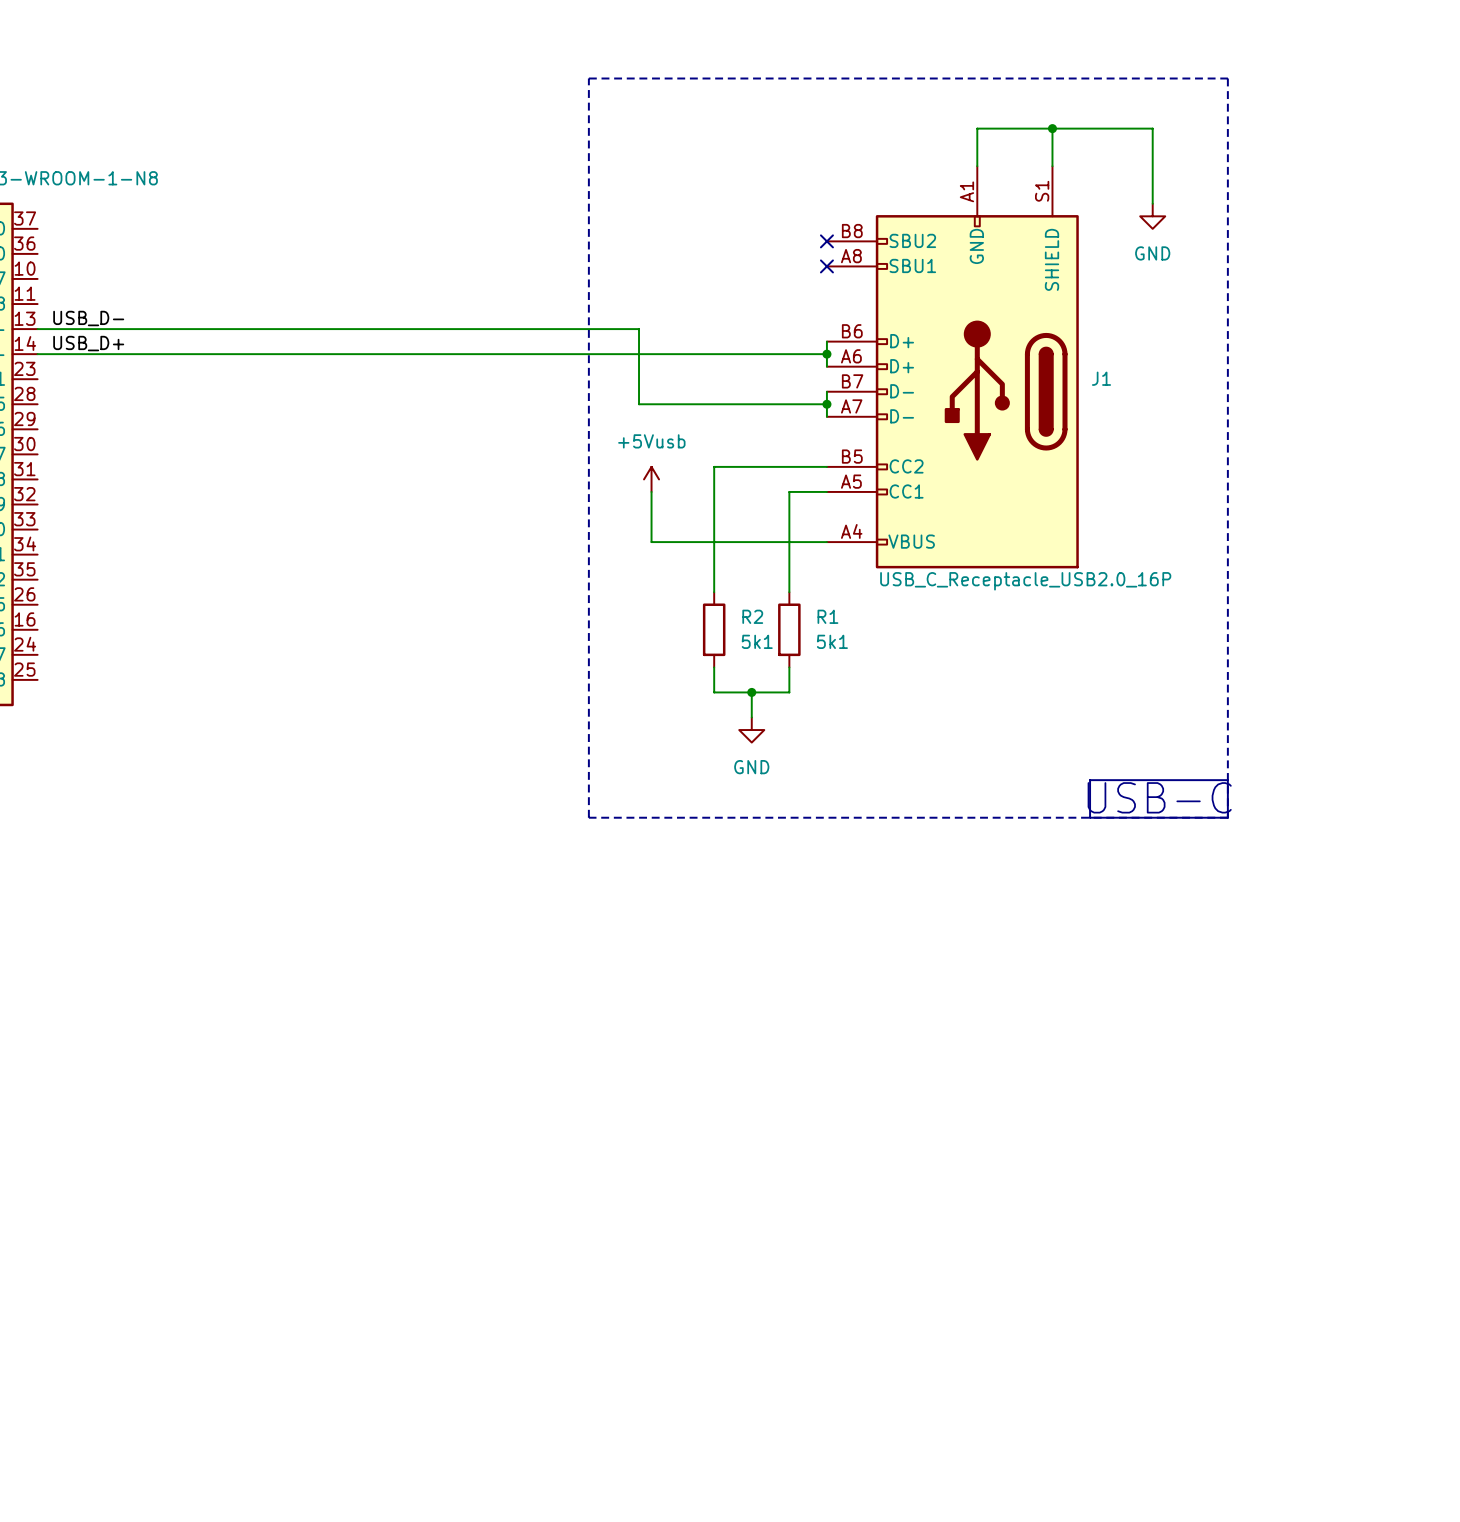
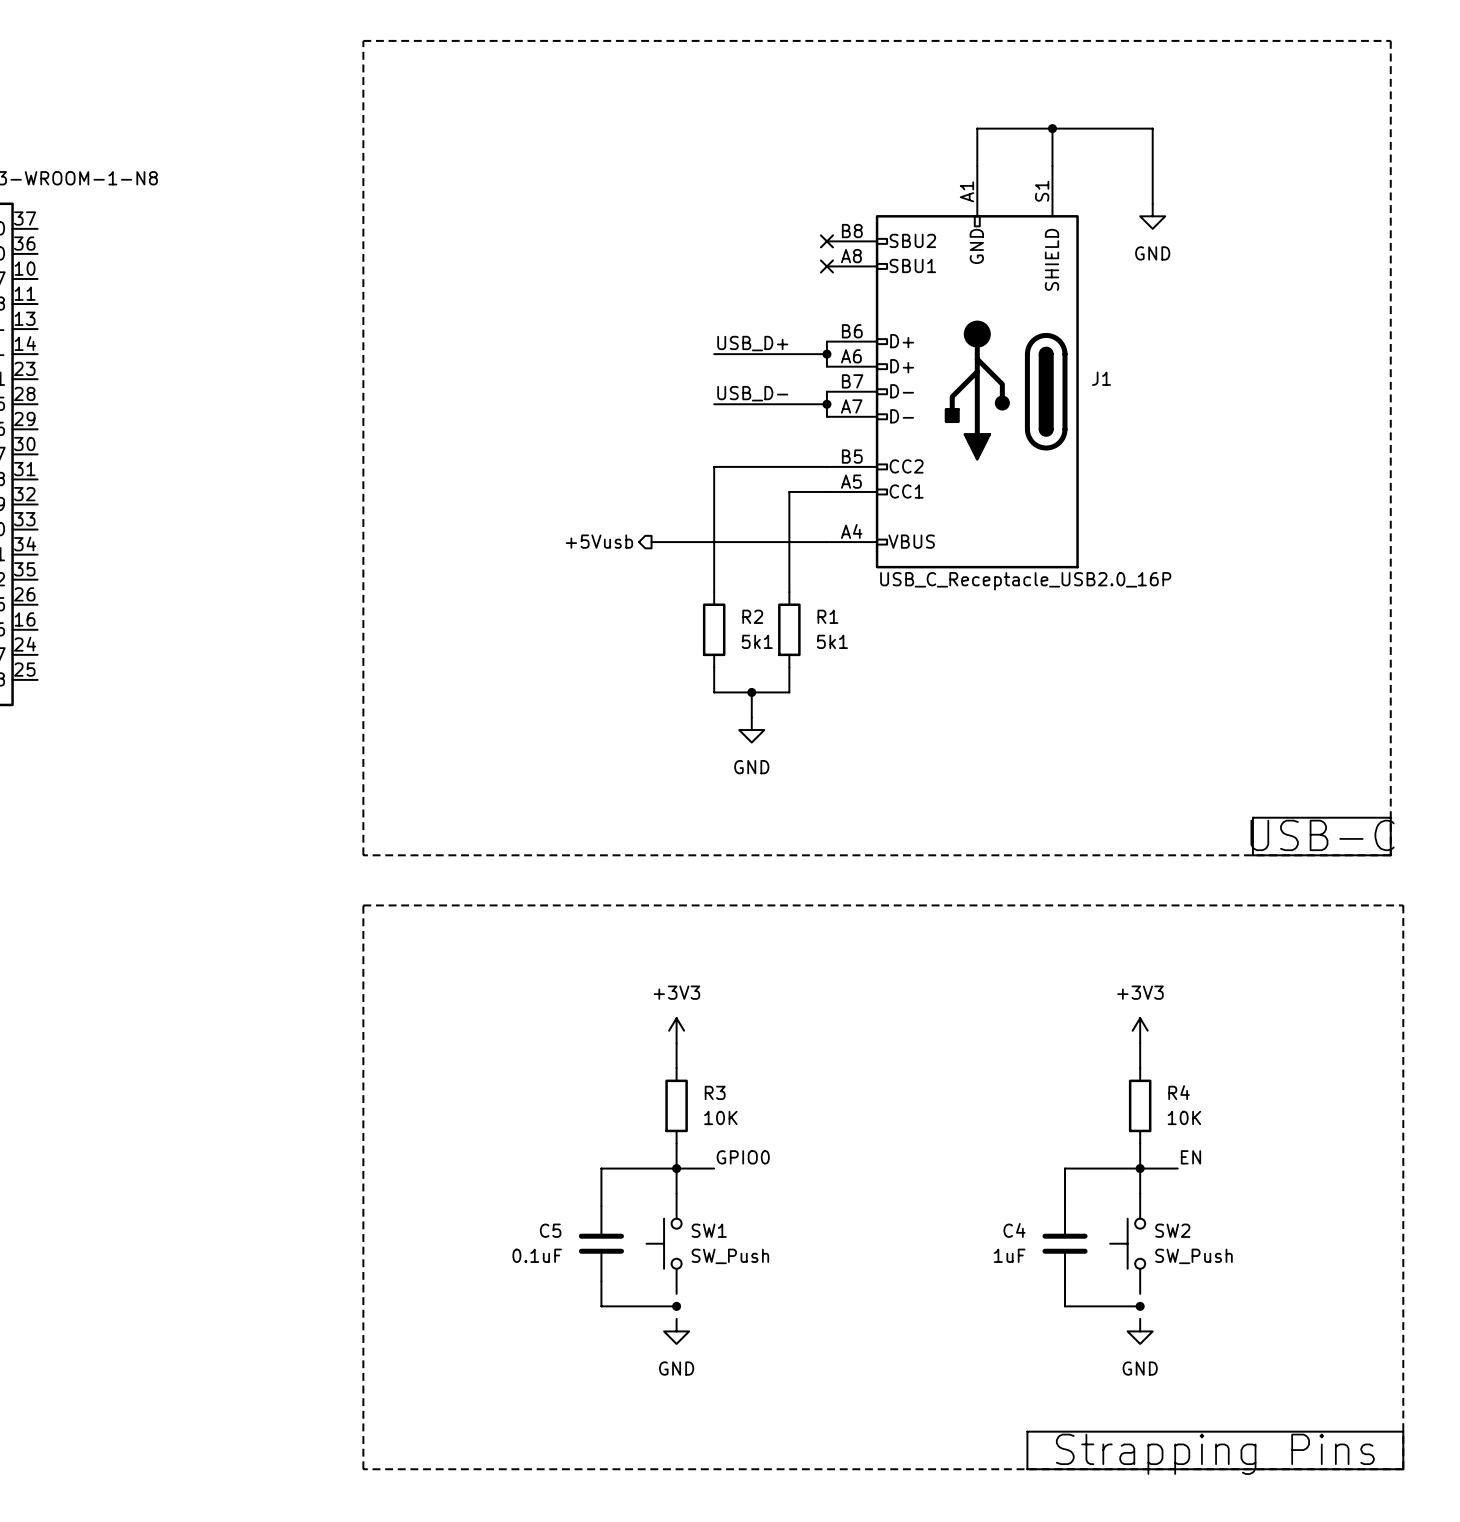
label: USB_D- (88, 318) -> none
wire: (37, 329) (639, 329) (639, 404) (714, 404) -> none
label: USB_D+ (88, 343) -> none
label: none -> USB_D+ (752, 343)
wire: (37, 354) (714, 354) -> none
label: none -> USB_D- (752, 393)
power symbol: +5Vusb (651, 479) -> none
wire: (651, 491) (651, 542) -> none
hierarchical label: none -> +5Vusb (599, 541)
text position: USB-C (1159, 797) -> USB-C (1322, 835)
line: (1227, 817) (1227, 780) (1090, 780) (1090, 817) (1227, 817) -> (1390, 855) (1390, 817) (1252, 817) (1252, 855) (1390, 855)
line: (1227, 817) (1227, 78) (588, 78) (588, 817) (1227, 817) -> (1390, 855) (363, 855) (363, 40) (1390, 40) (1390, 855)
power symbol: none -> +3V3 (676, 1030)
power symbol: none -> +3V3 (1140, 1030)
wire: none -> (676, 1043) (676, 1068)
wire: none -> (1140, 1043) (1140, 1068)
R3: none -> 10K (676, 1105)
R4: none -> 10K (1140, 1105)
wire: none -> (676, 1143) (676, 1193)
wire: none -> (1140, 1143) (1140, 1193)
label: none -> GPIO0 (743, 1157)
label: none -> EN (1190, 1157)
junction: none -> (676, 1168)
wire: none -> (714, 1168) (601, 1168) (601, 1206)
junction: none -> (1140, 1168)
wire: none -> (1177, 1168) (1065, 1168) (1065, 1206)
C5: none -> 0.1uF (601, 1243)
SW1: none -> SW_Push (664, 1243)
C4: none -> 1uF (1065, 1243)
SW2: none -> SW_Push (1127, 1243)
wire: none -> (601, 1281) (601, 1306) (676, 1306)
wire: none -> (1065, 1281) (1065, 1306) (1140, 1306)
junction: none -> (676, 1306)
junction: none -> (1140, 1306)
power symbol: none -> GND (676, 1331)
power symbol: none -> GND (1140, 1331)
text: none -> Strapping Pins (1215, 1454)
line: none -> (1403, 1469) (1403, 905) (363, 905) (363, 1469) (1403, 1469)
line: none -> (1403, 1469) (1403, 1431) (1027, 1431) (1027, 1469) (1403, 1469)

